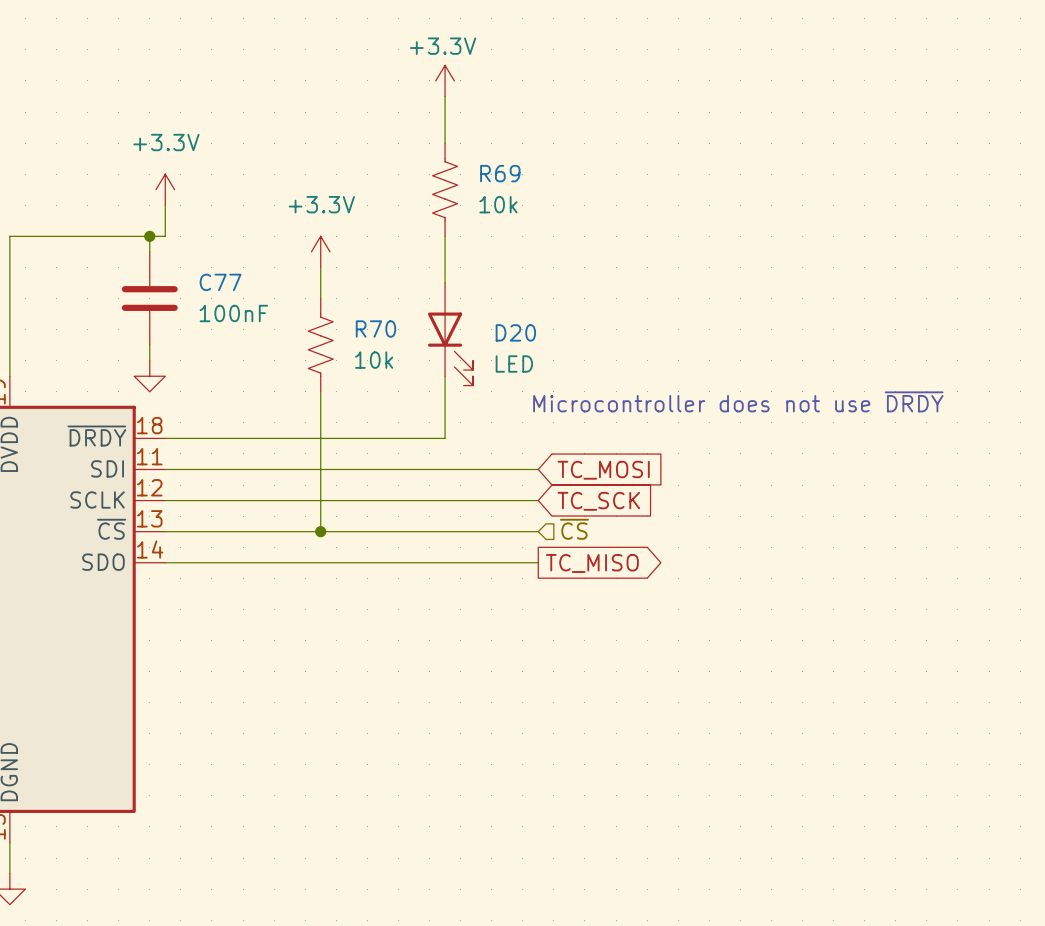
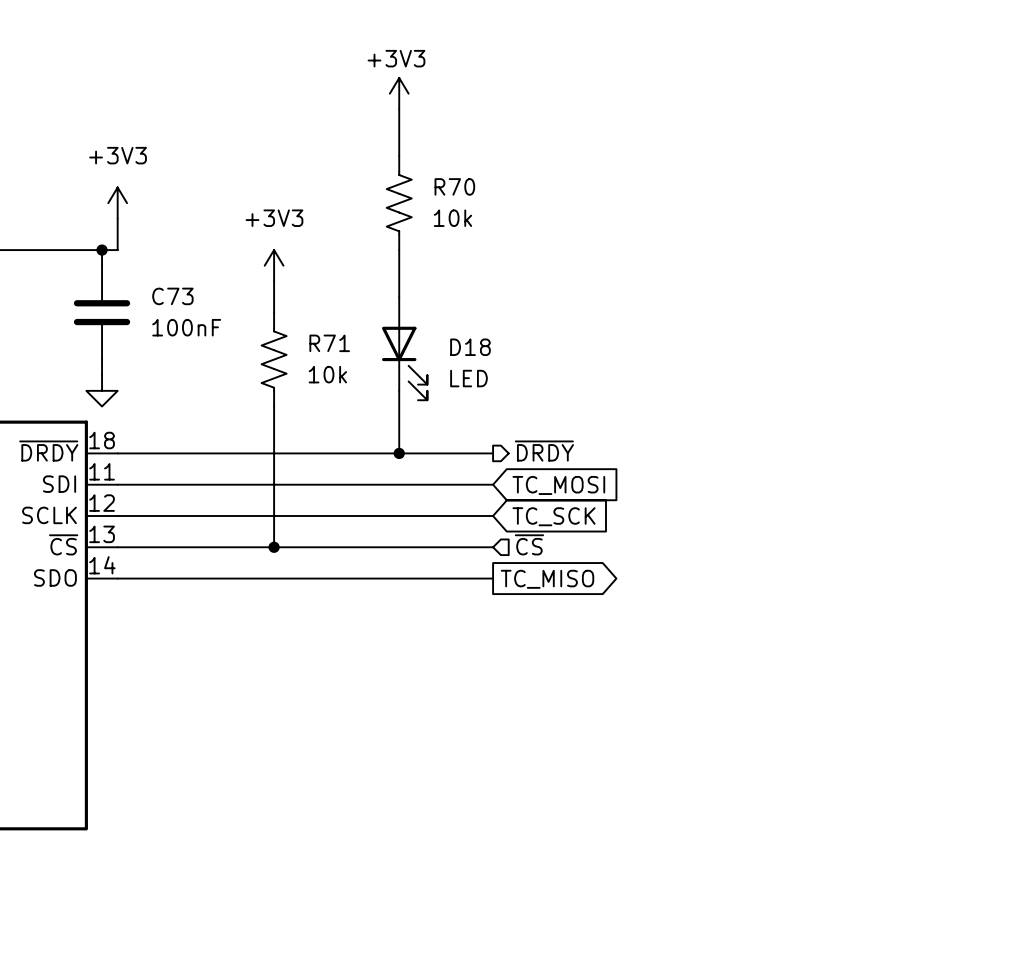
power symbol: +3.3V (445, 80) -> +3V3 (399, 93)
R69 name: R69 (500, 173) -> R70 (454, 186)
power symbol: +3.3V (165, 189) -> +3V3 (117, 203)
power symbol: +3.3V (320, 251) -> +3V3 (274, 265)
C77 name: C77 (220, 282) -> C73 (172, 296)
R70 name: R70 (375, 329) -> R71 (329, 343)
D20 name: D20 (515, 332) -> D18 (470, 347)
text: Microcontroller does not use ~{DRDY} (738, 401) -> none
hierarchical label: none -> ~{DRDY} (544, 451)
wire: none -> (399, 453) (493, 453)
junction: none -> (399, 453)

